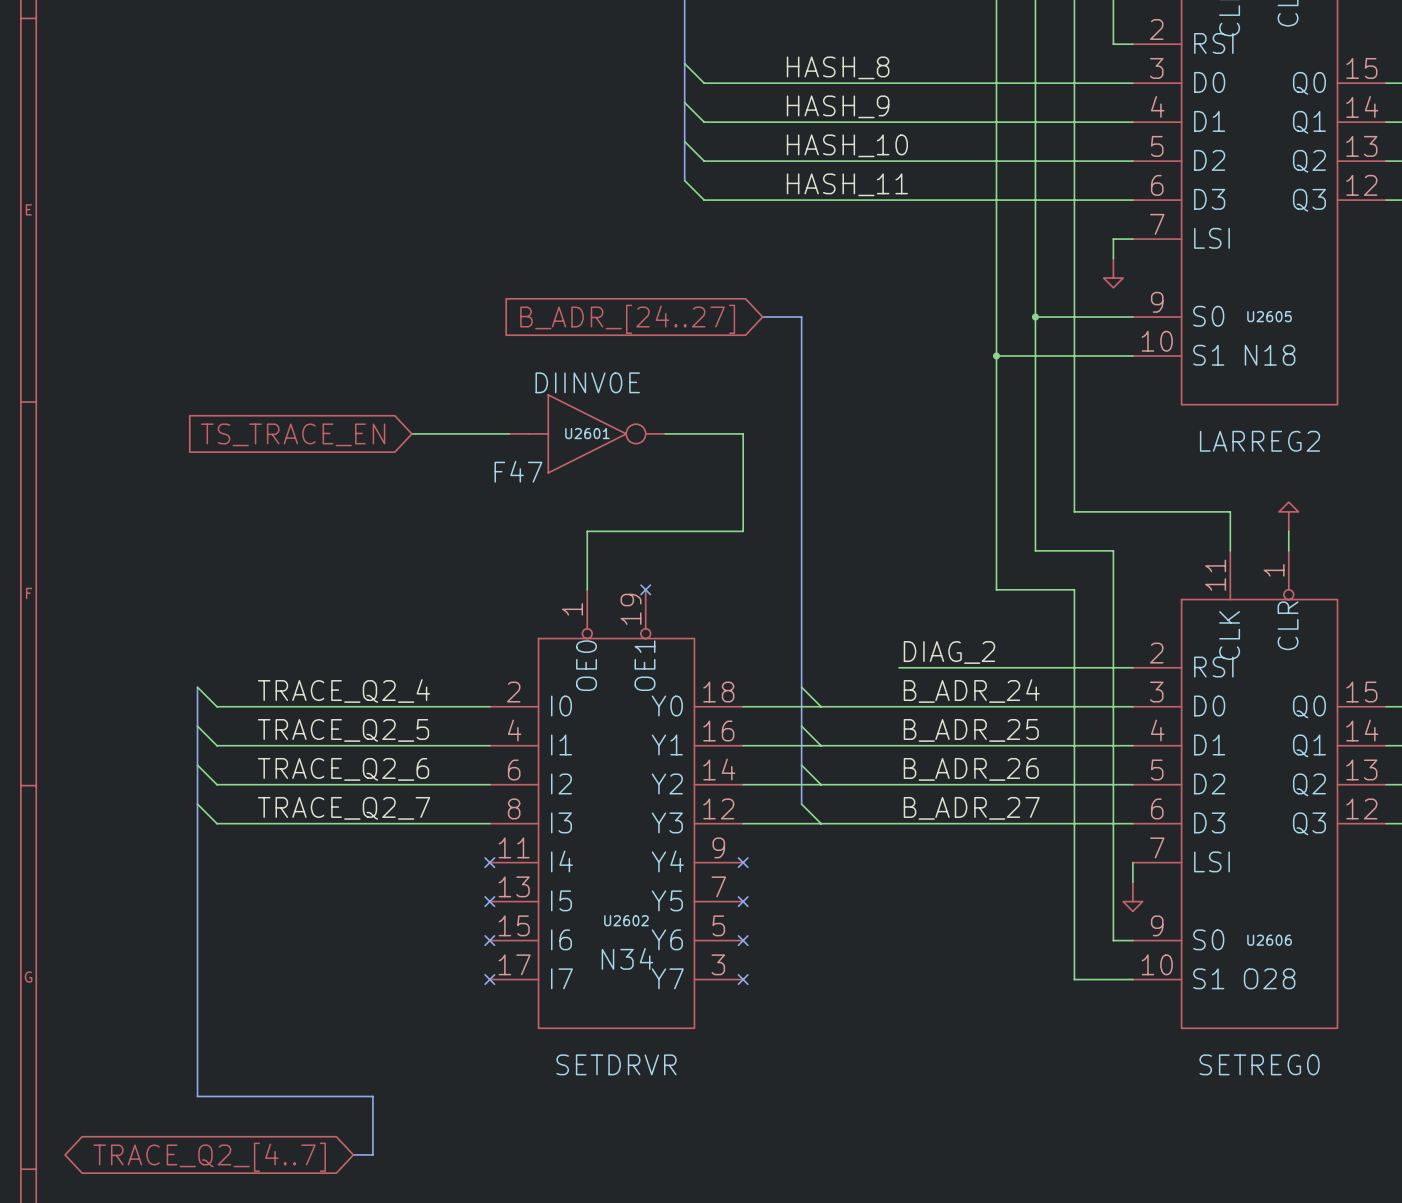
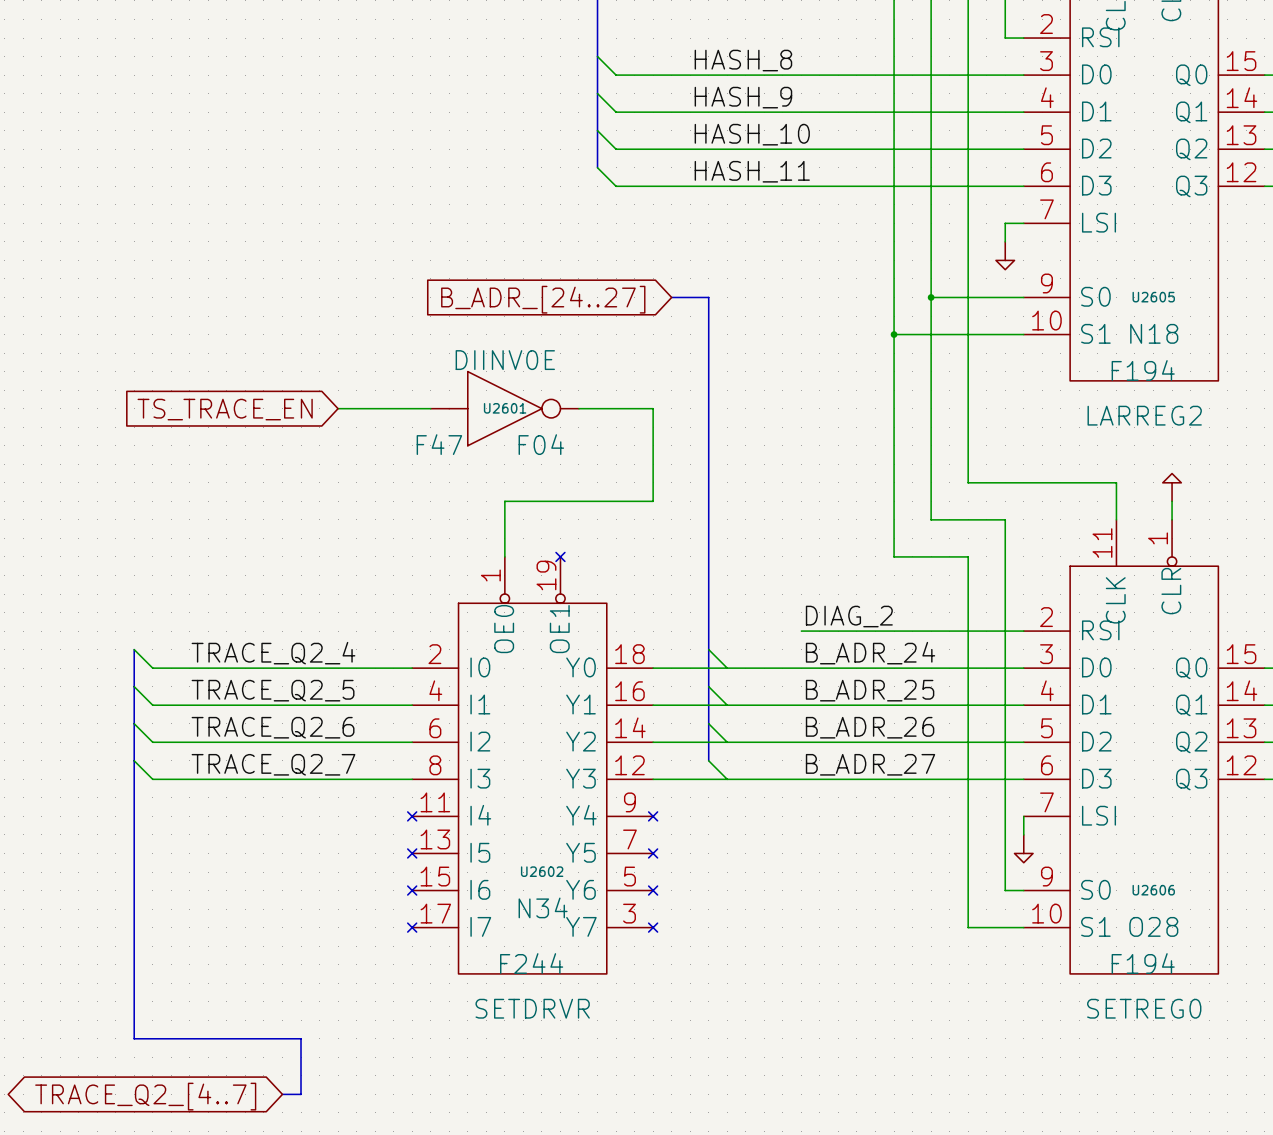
U2605 value: none -> F194 (1143, 370)
U2601 value: none -> F04 (541, 444)
U2602 value: none -> F244 (531, 963)
U2606 value: none -> F194 (1143, 963)

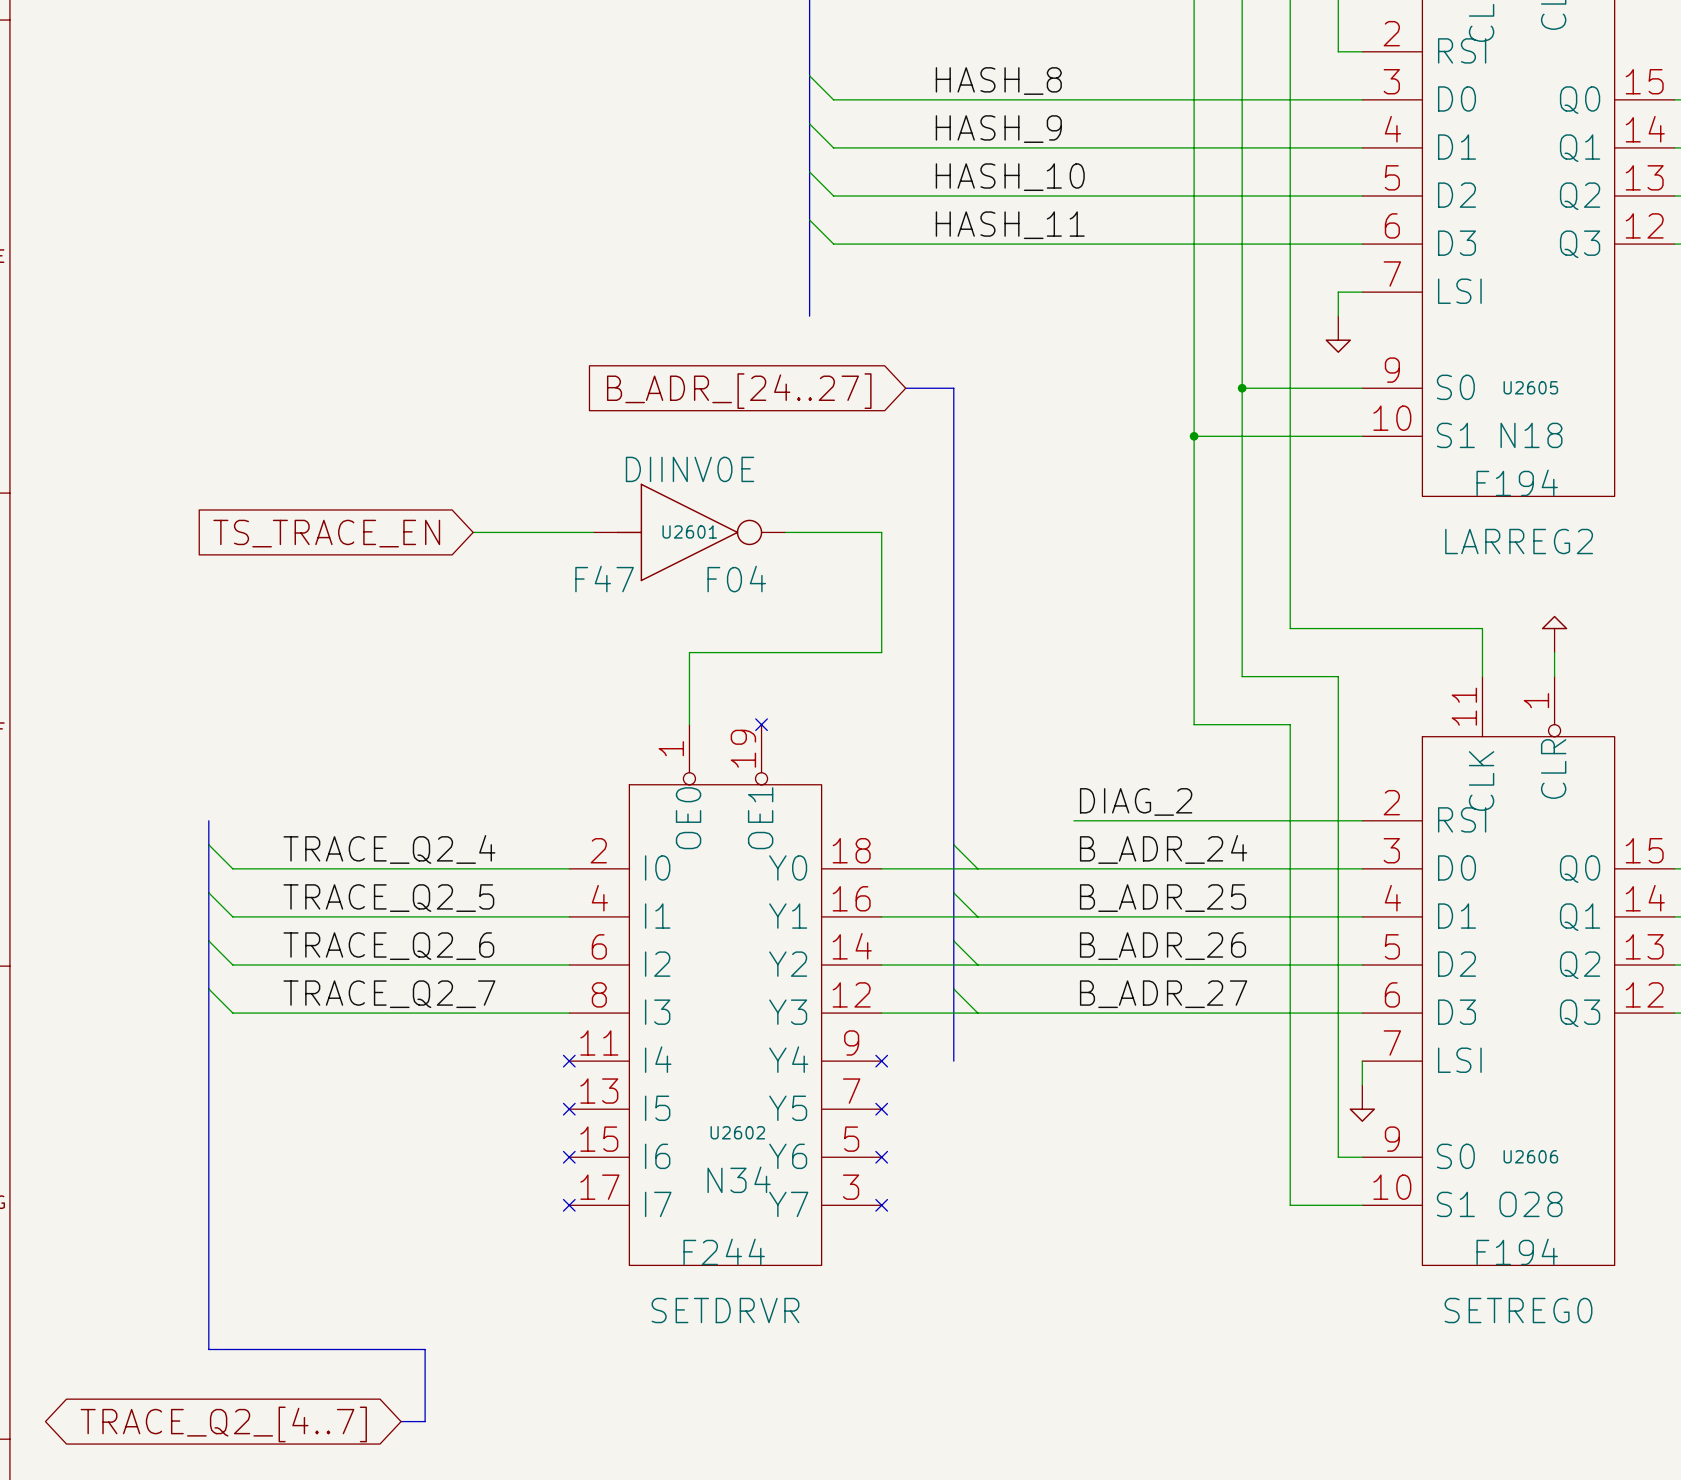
bus: none -> (809, 220) (809, 316)
bus: none -> (208, 820) (208, 844)
bus: none -> (953, 989) (953, 1061)

